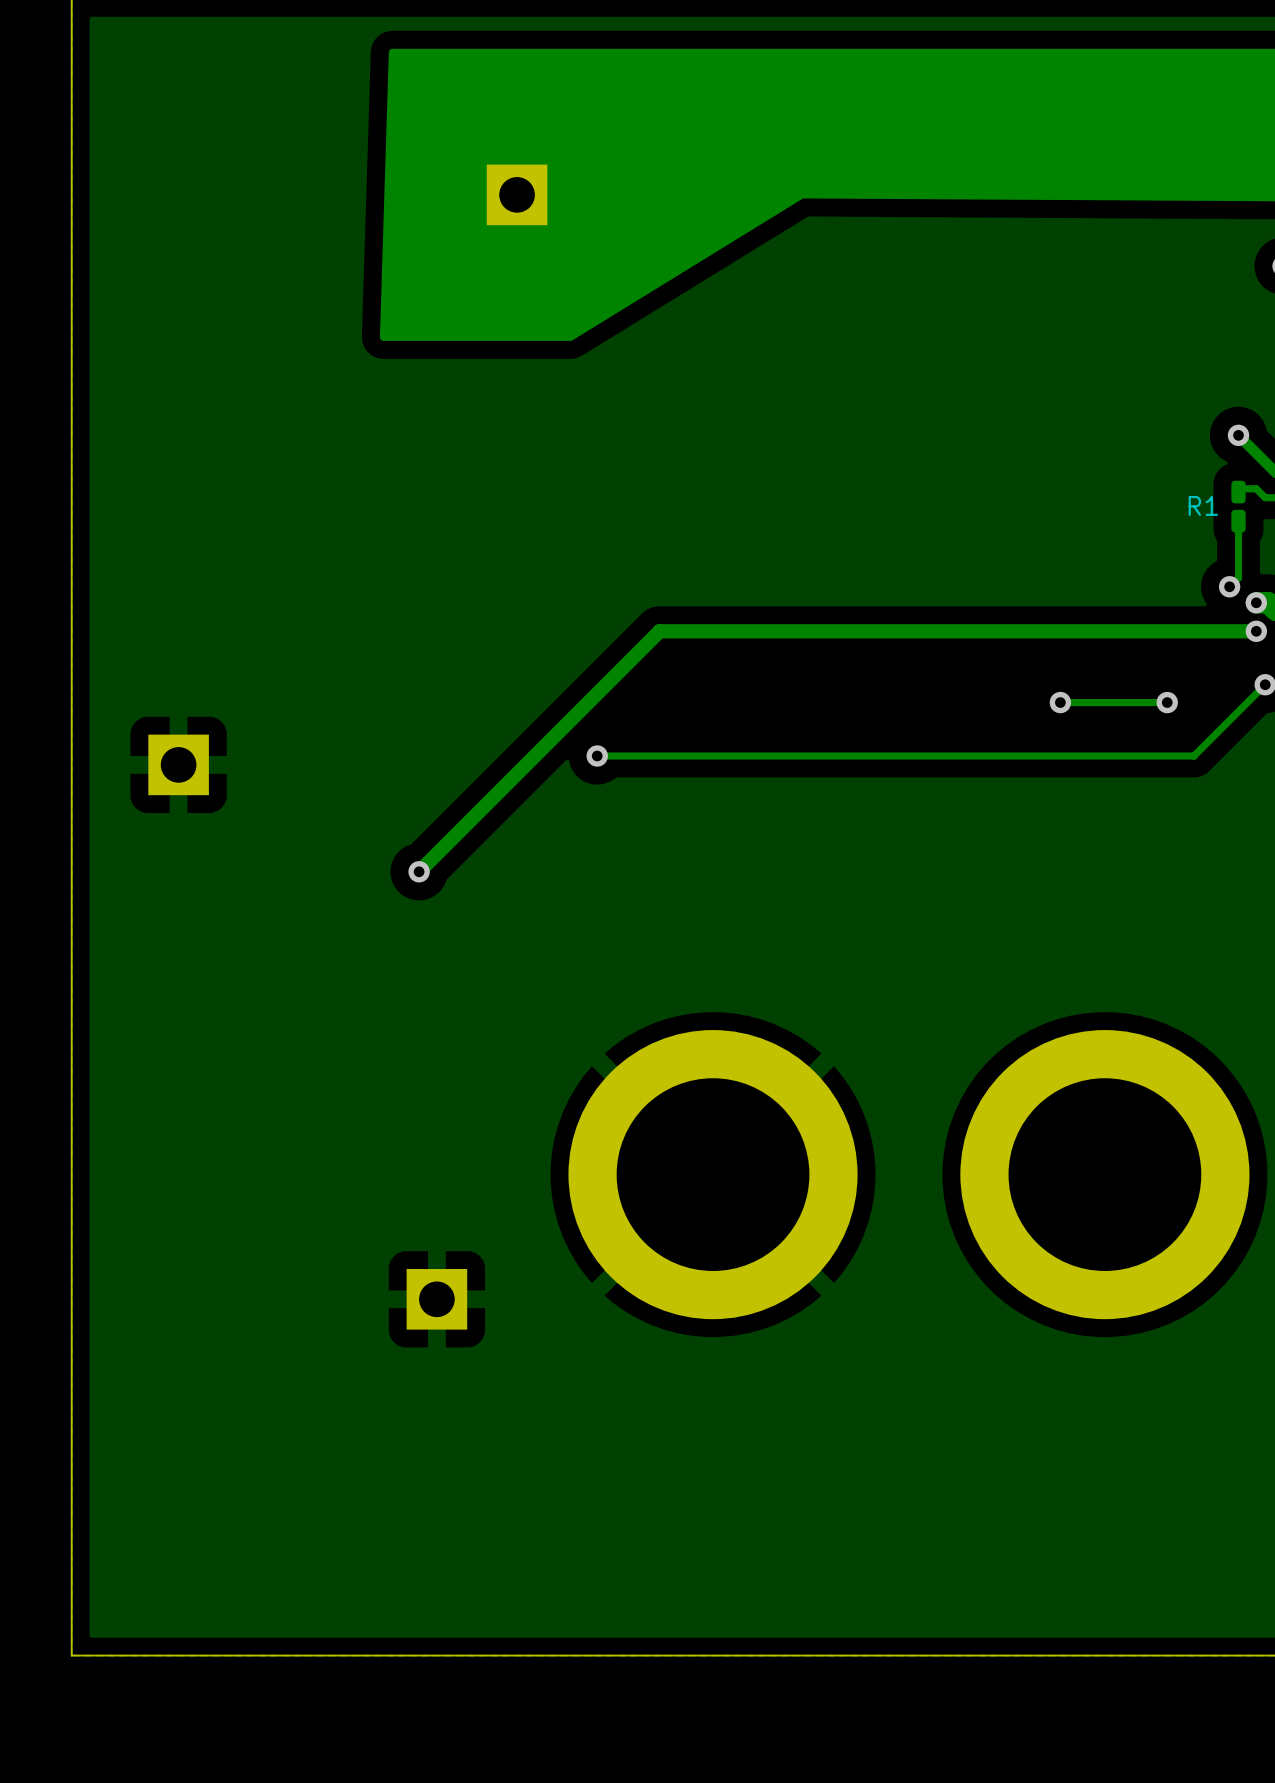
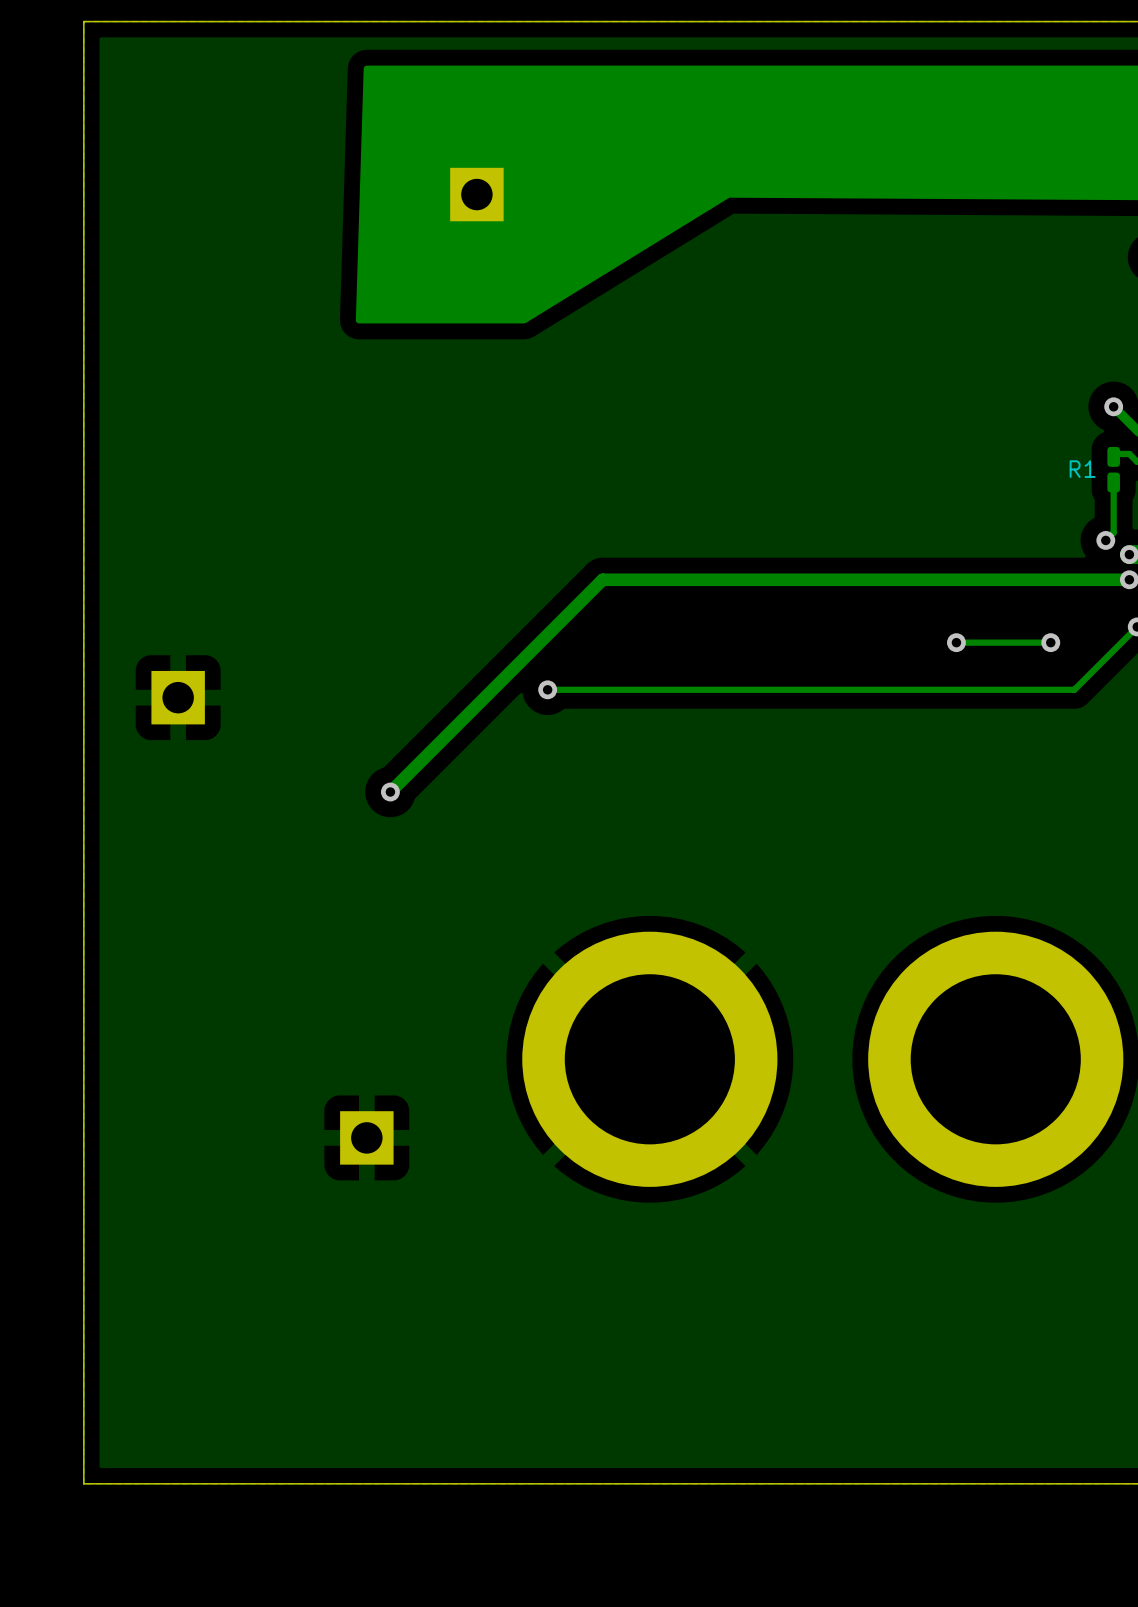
part position: (436, 1299) -> (366, 1137)

